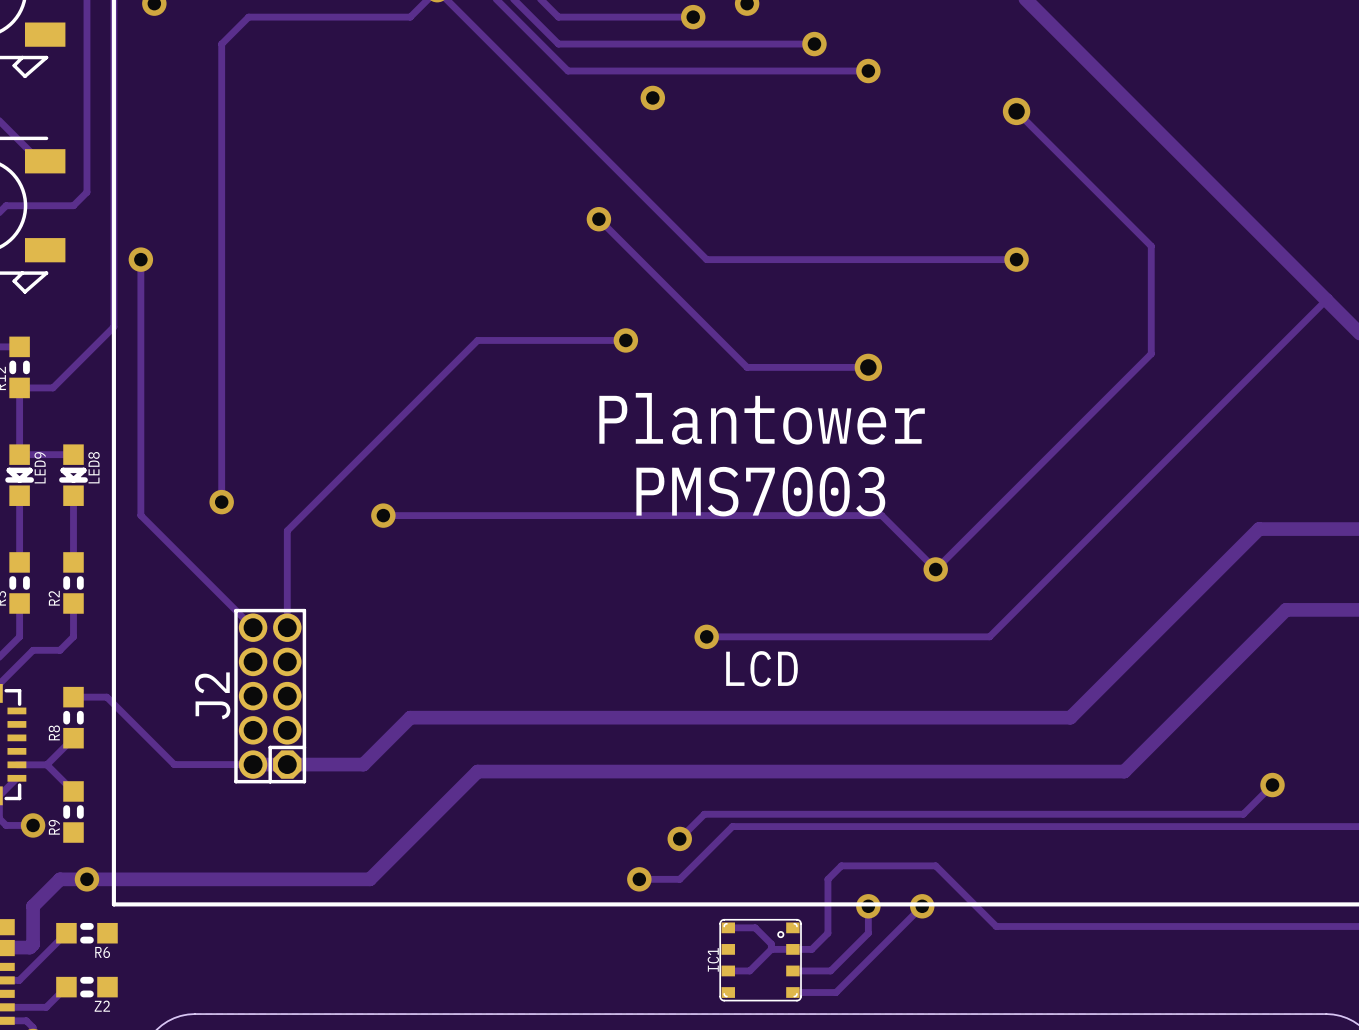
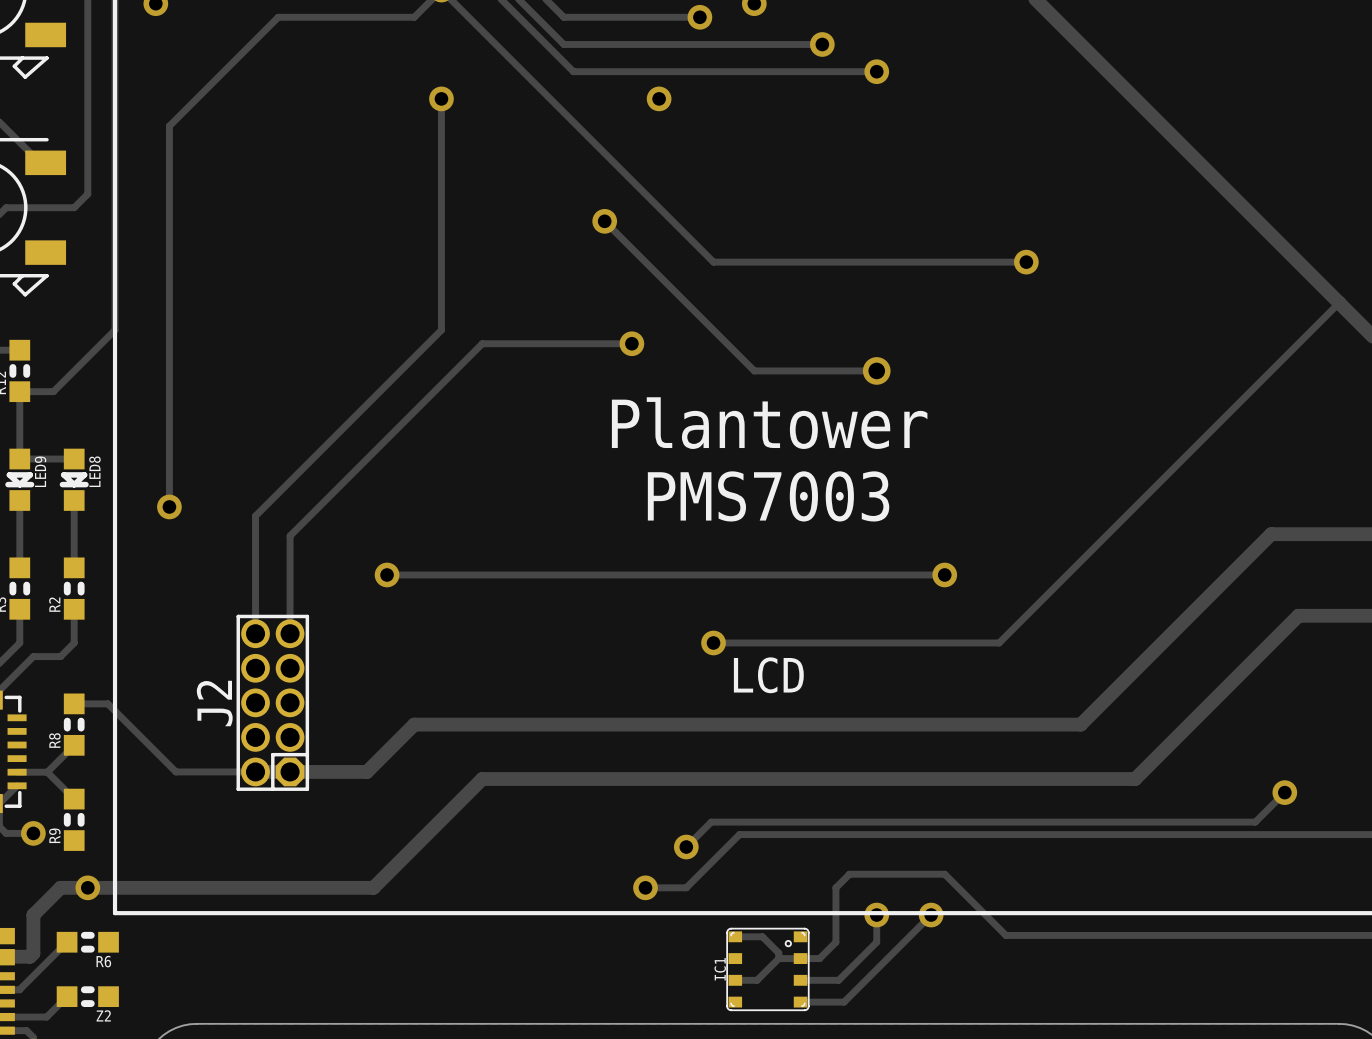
track: (275, 17) (248, 17) (221, 44) (221, 502) -> (278, 17) (169, 126) (169, 506)
via: none -> (441, 98)
track: (1016, 111) (1151, 246) (1151, 353) (935, 569) (881, 515) (383, 515) -> none
via: (1016, 111) -> none
track: (140, 259) (140, 515) (253, 627) -> (441, 98) (441, 330) (255, 516) (255, 633)
via: (140, 259) -> none
via position: (221, 502) -> (169, 506)
via position: (383, 515) -> (387, 574)
track: none -> (387, 574) (944, 574)

